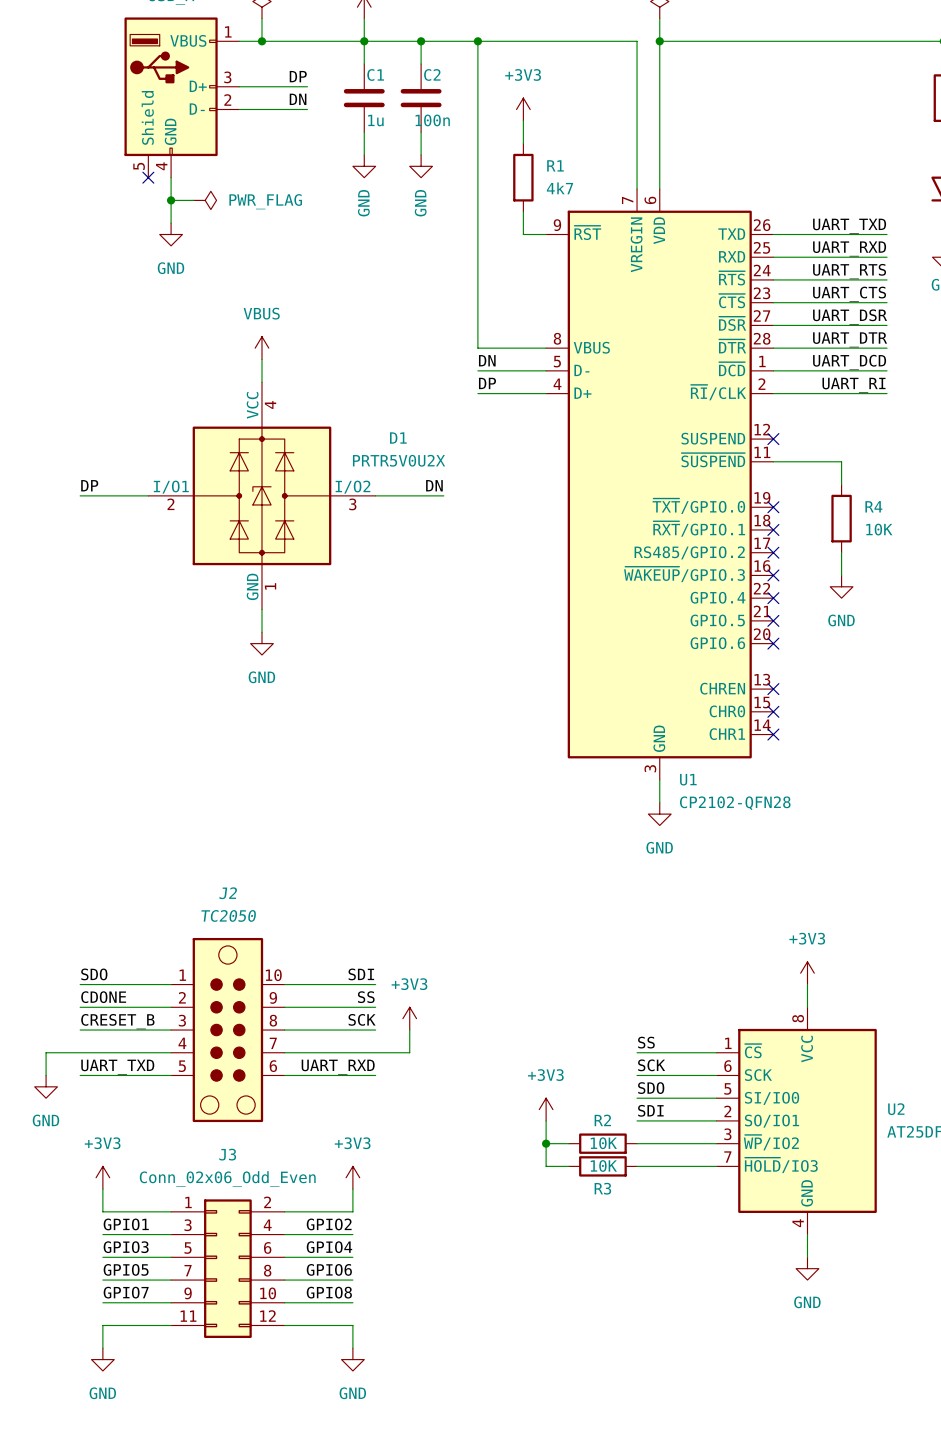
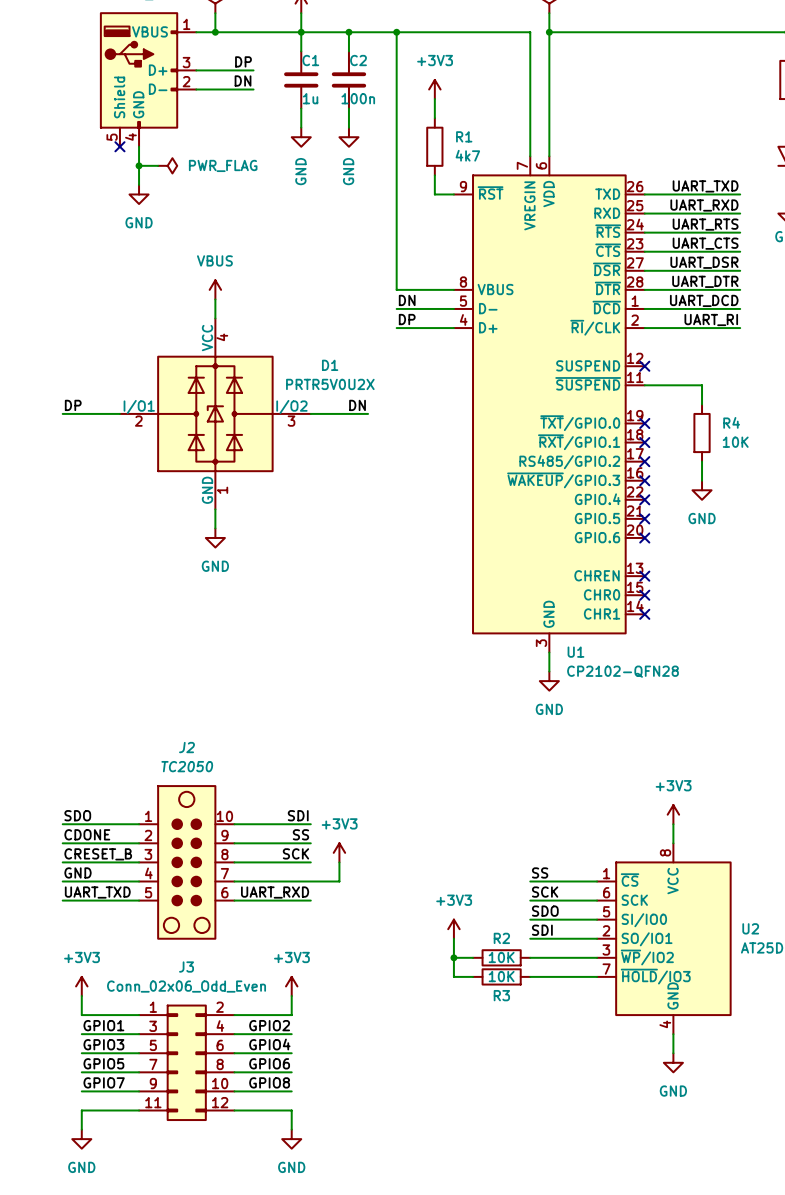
label: none -> GND (78, 872)
wire: (80, 1052) (46, 1052) (46, 1075) -> none
power symbol: GND (46, 1086) -> none

